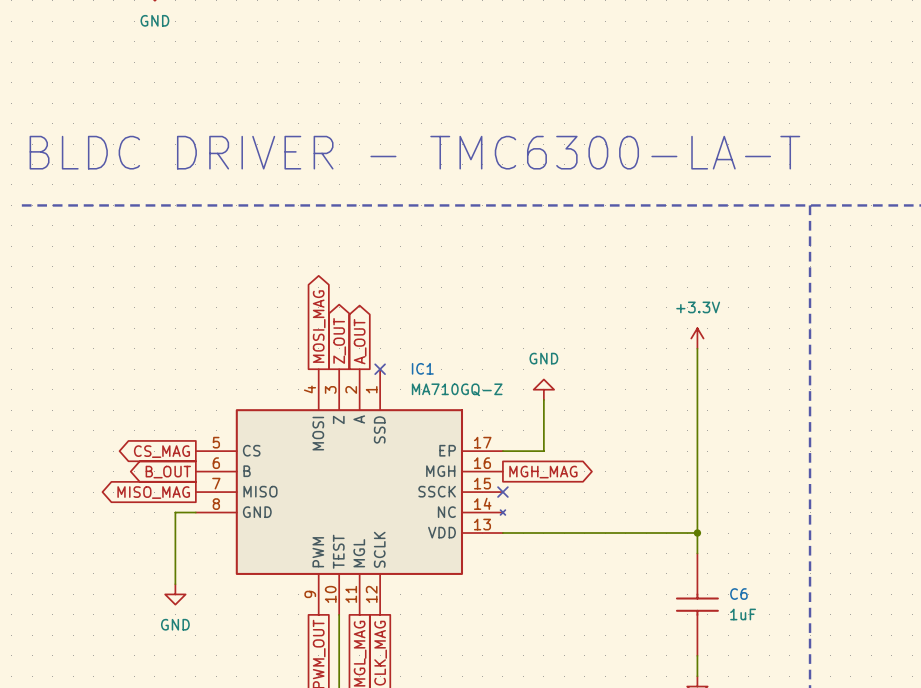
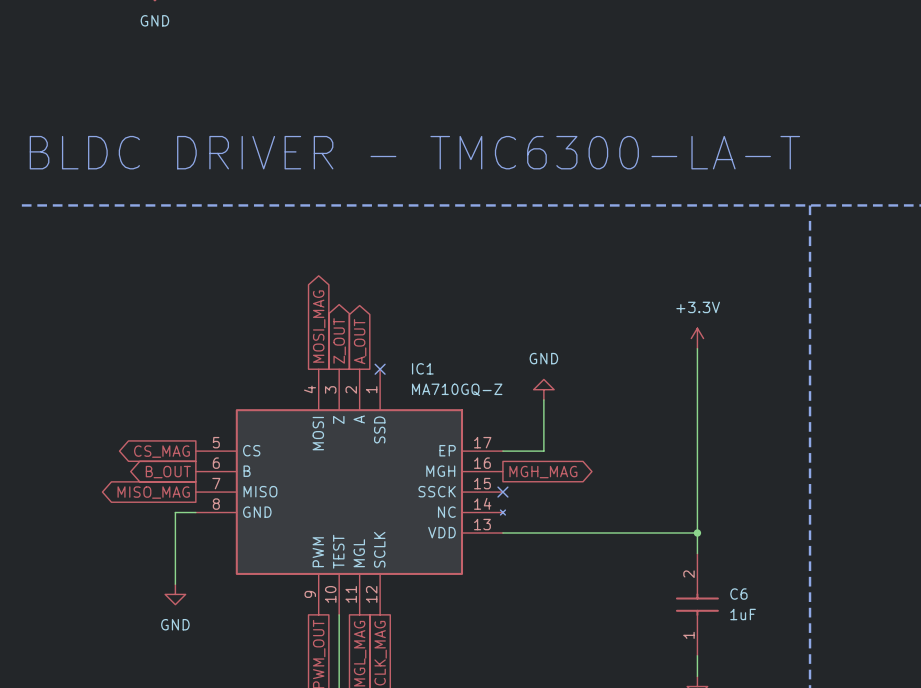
C6 pin number: none -> 2 (688, 574)
C6 pin number: none -> 1 (688, 635)

